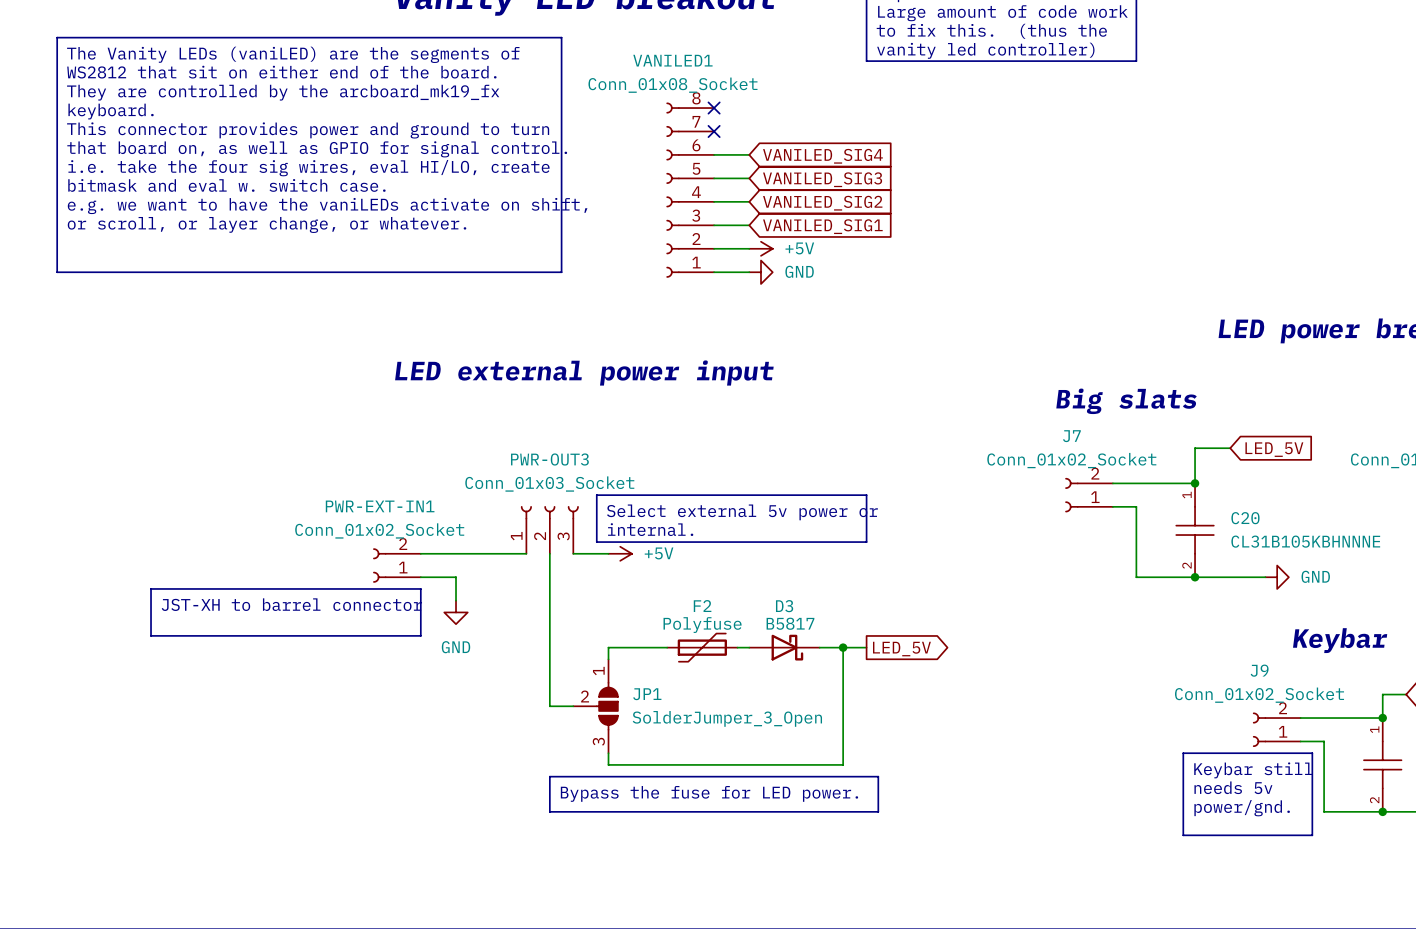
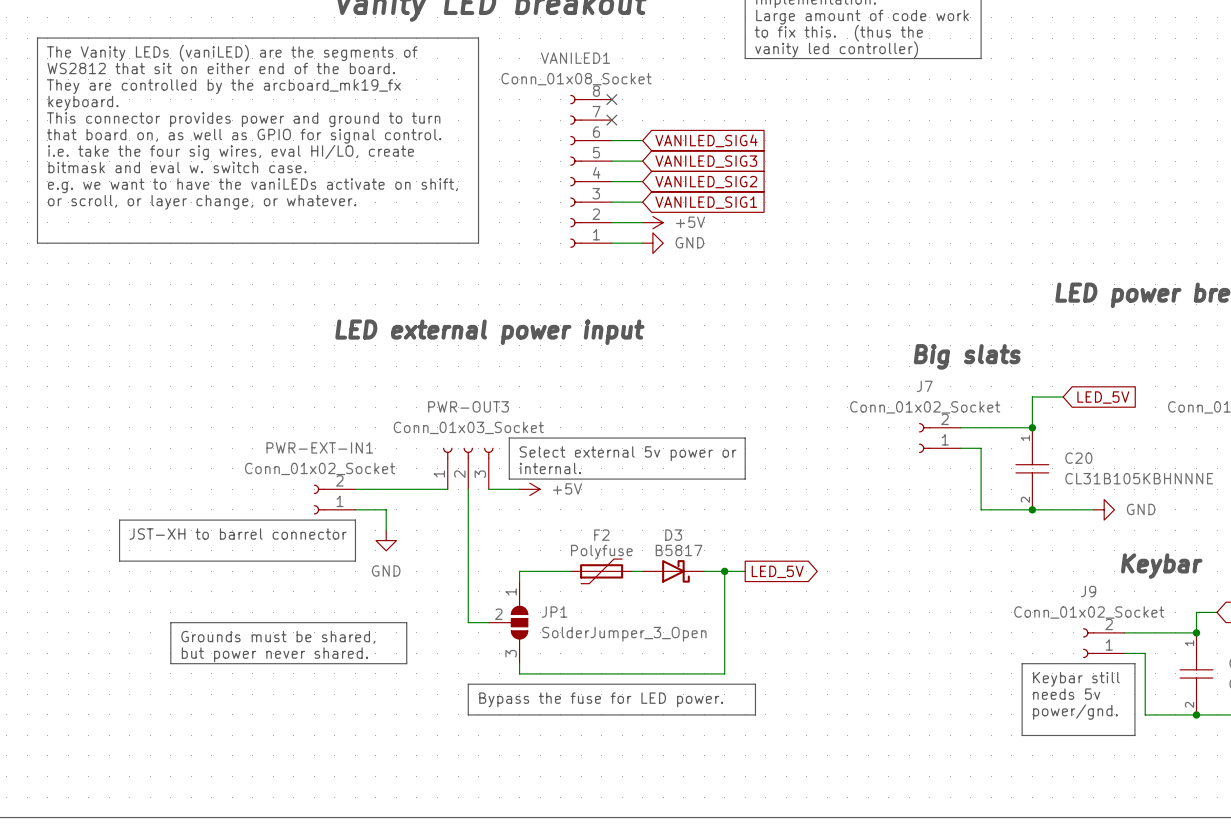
line: none -> (170, 622) (406, 622) (406, 663) (170, 663) (170, 622)
text: none -> Grounds must be shared, (278, 637)
text: none -> but power never shared. (274, 654)

